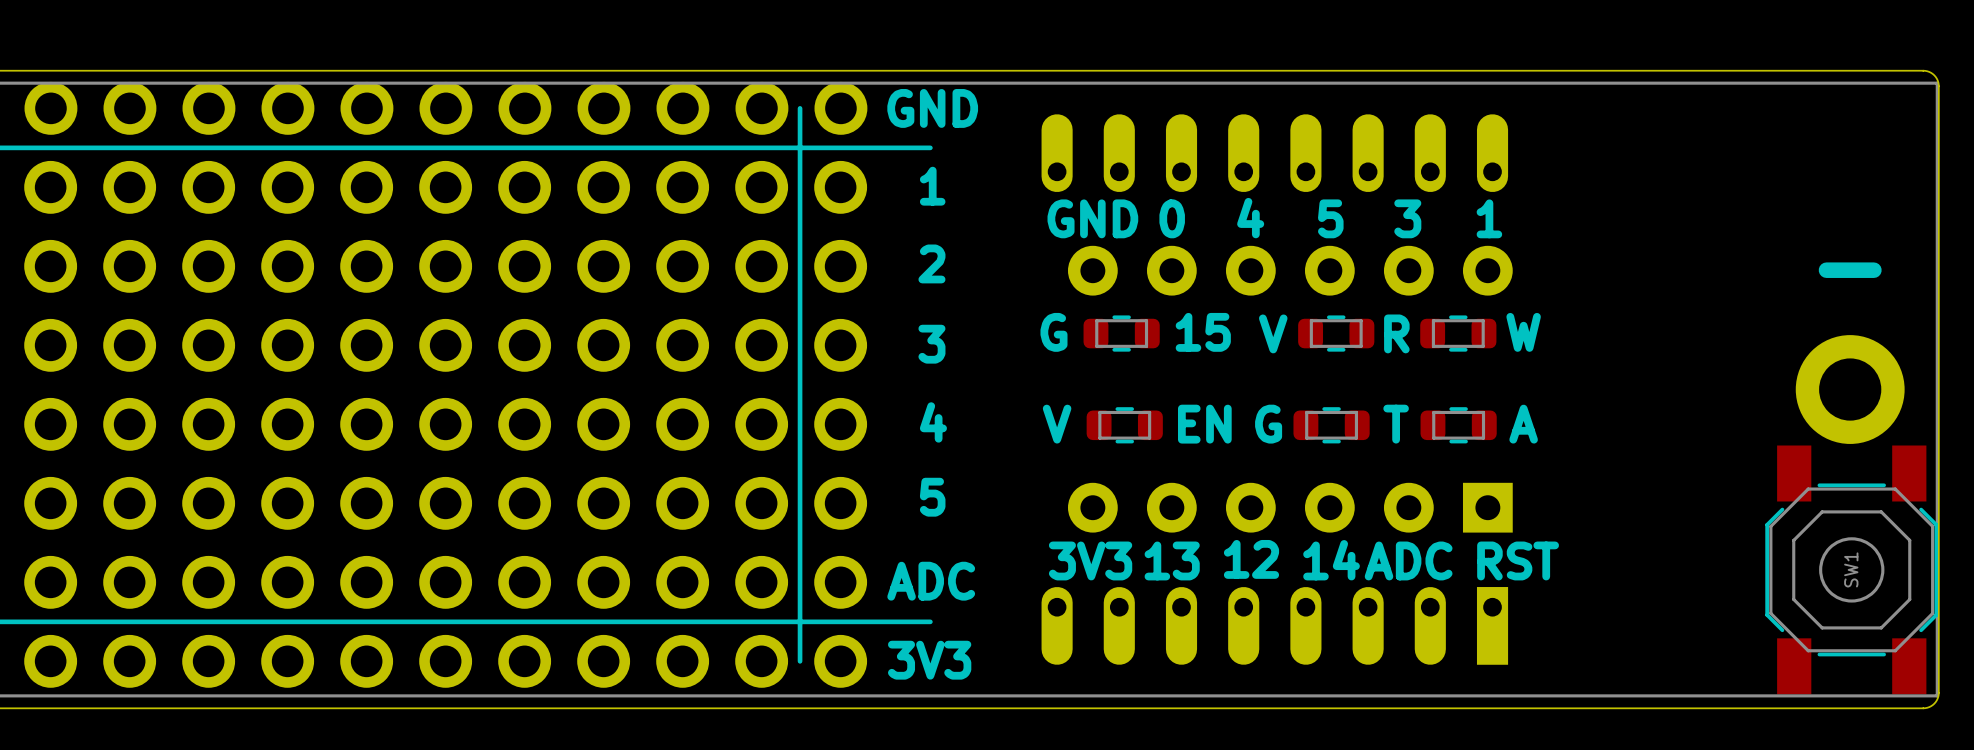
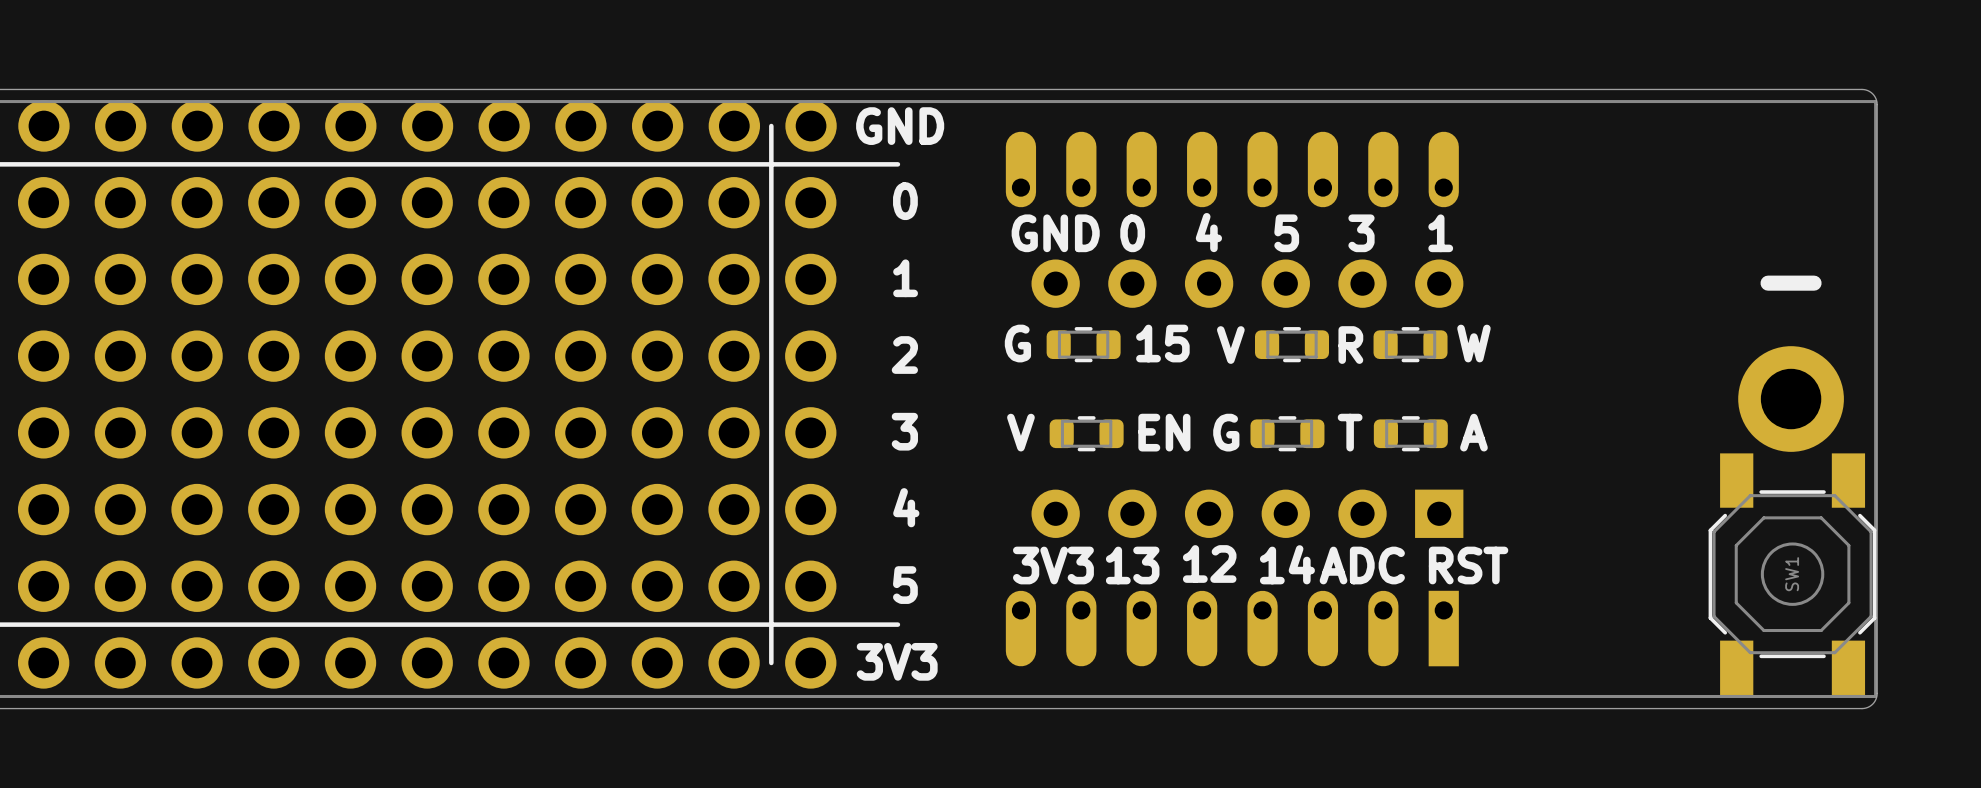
text: 1 (932, 186) -> 0 (905, 201)
text: 2 (931, 263) -> 1 (905, 278)
text: 3 (931, 344) -> 2 (904, 355)
text: 4 (933, 422) -> 3 (904, 431)
text: 5 (932, 497) -> 4 (906, 507)
text: ADC (931, 581) -> 5 (905, 585)

